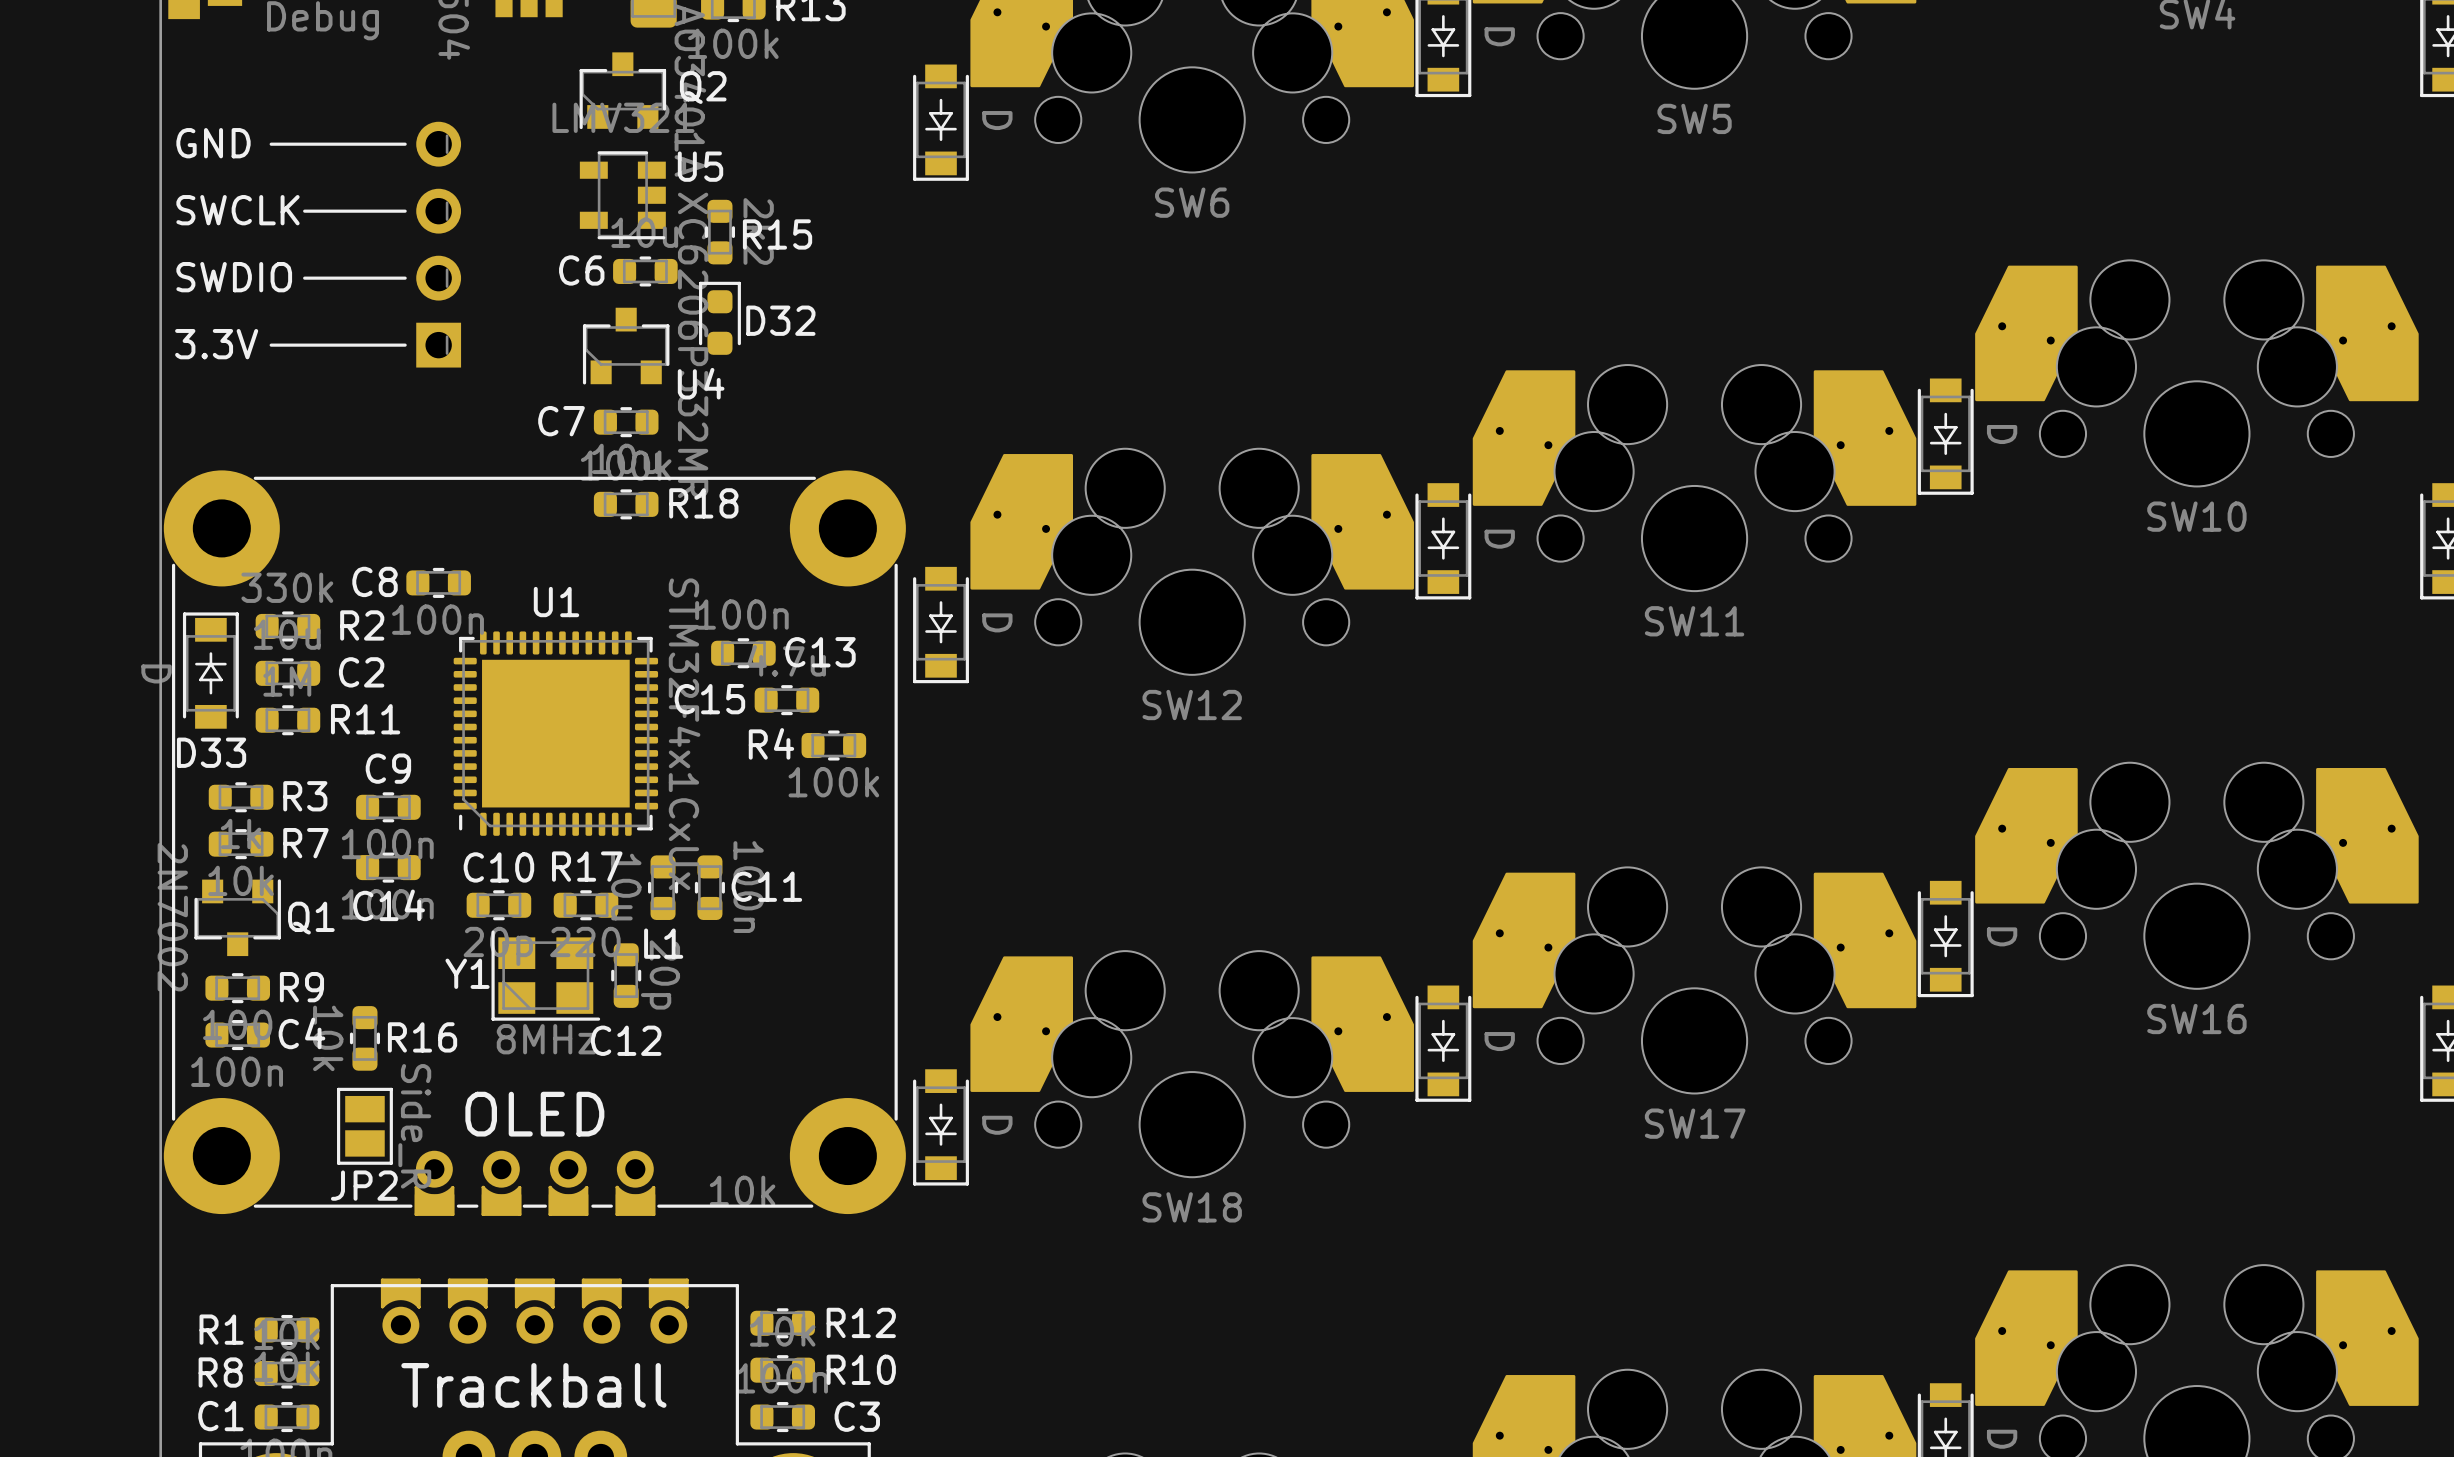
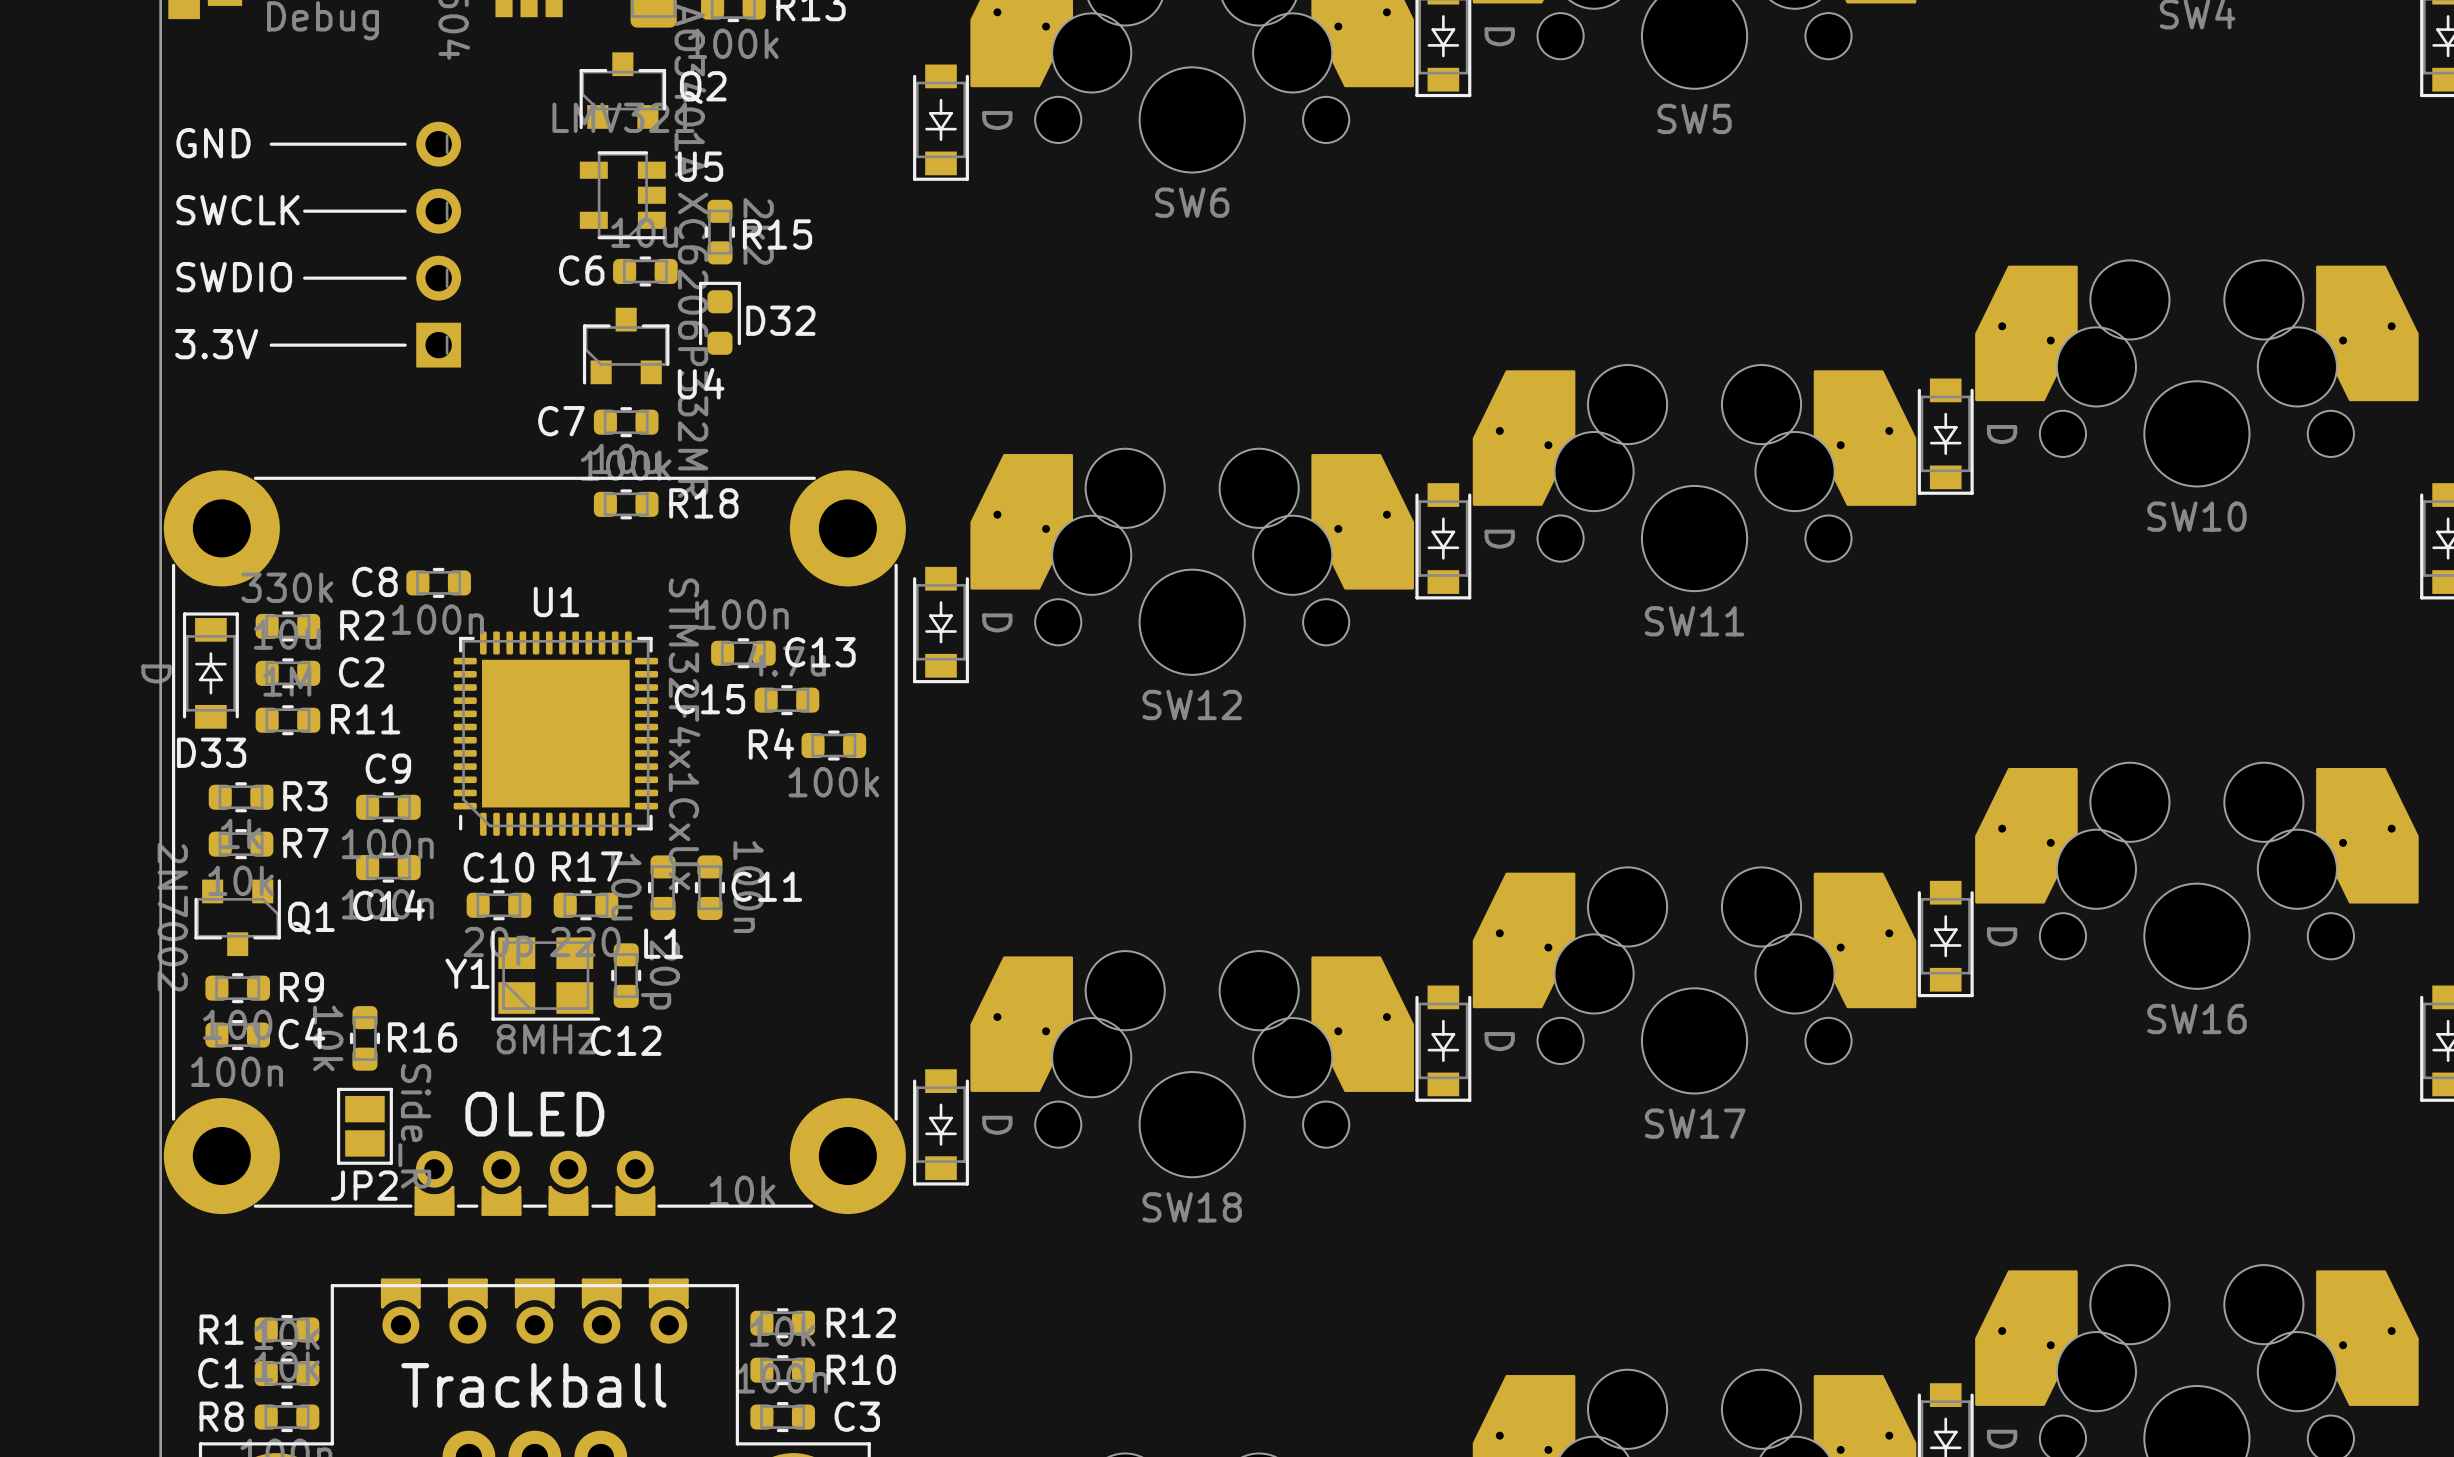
R8 name position: R8 (220, 1372) -> R8 (221, 1416)
C1 name position: C1 (220, 1416) -> C1 (220, 1373)

